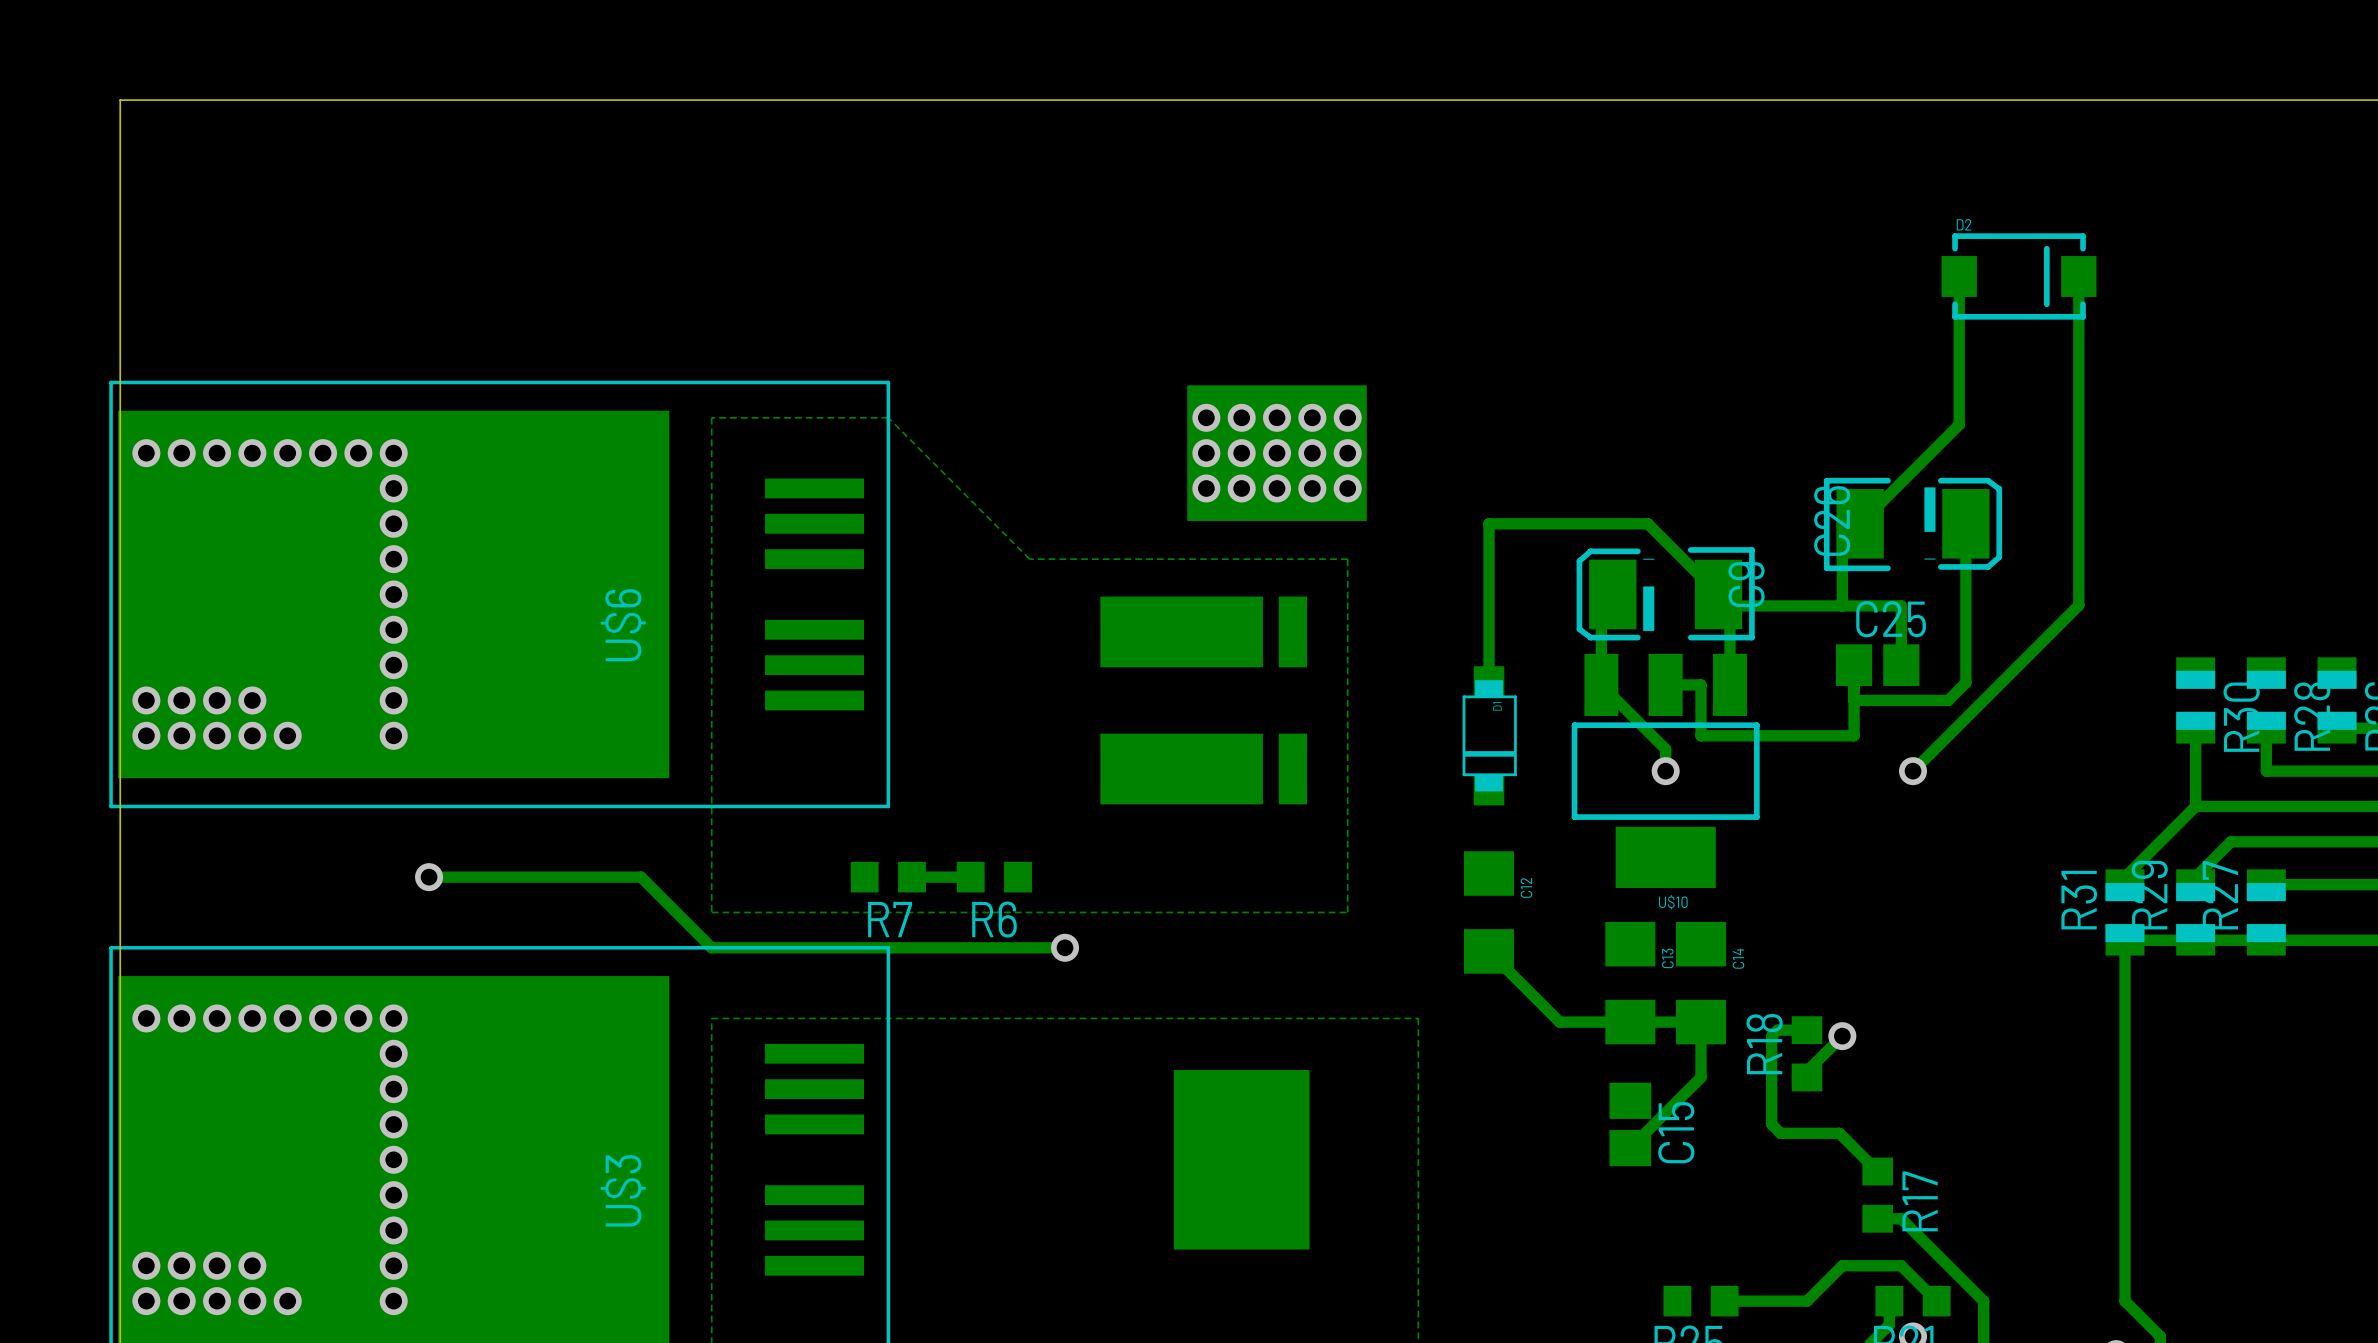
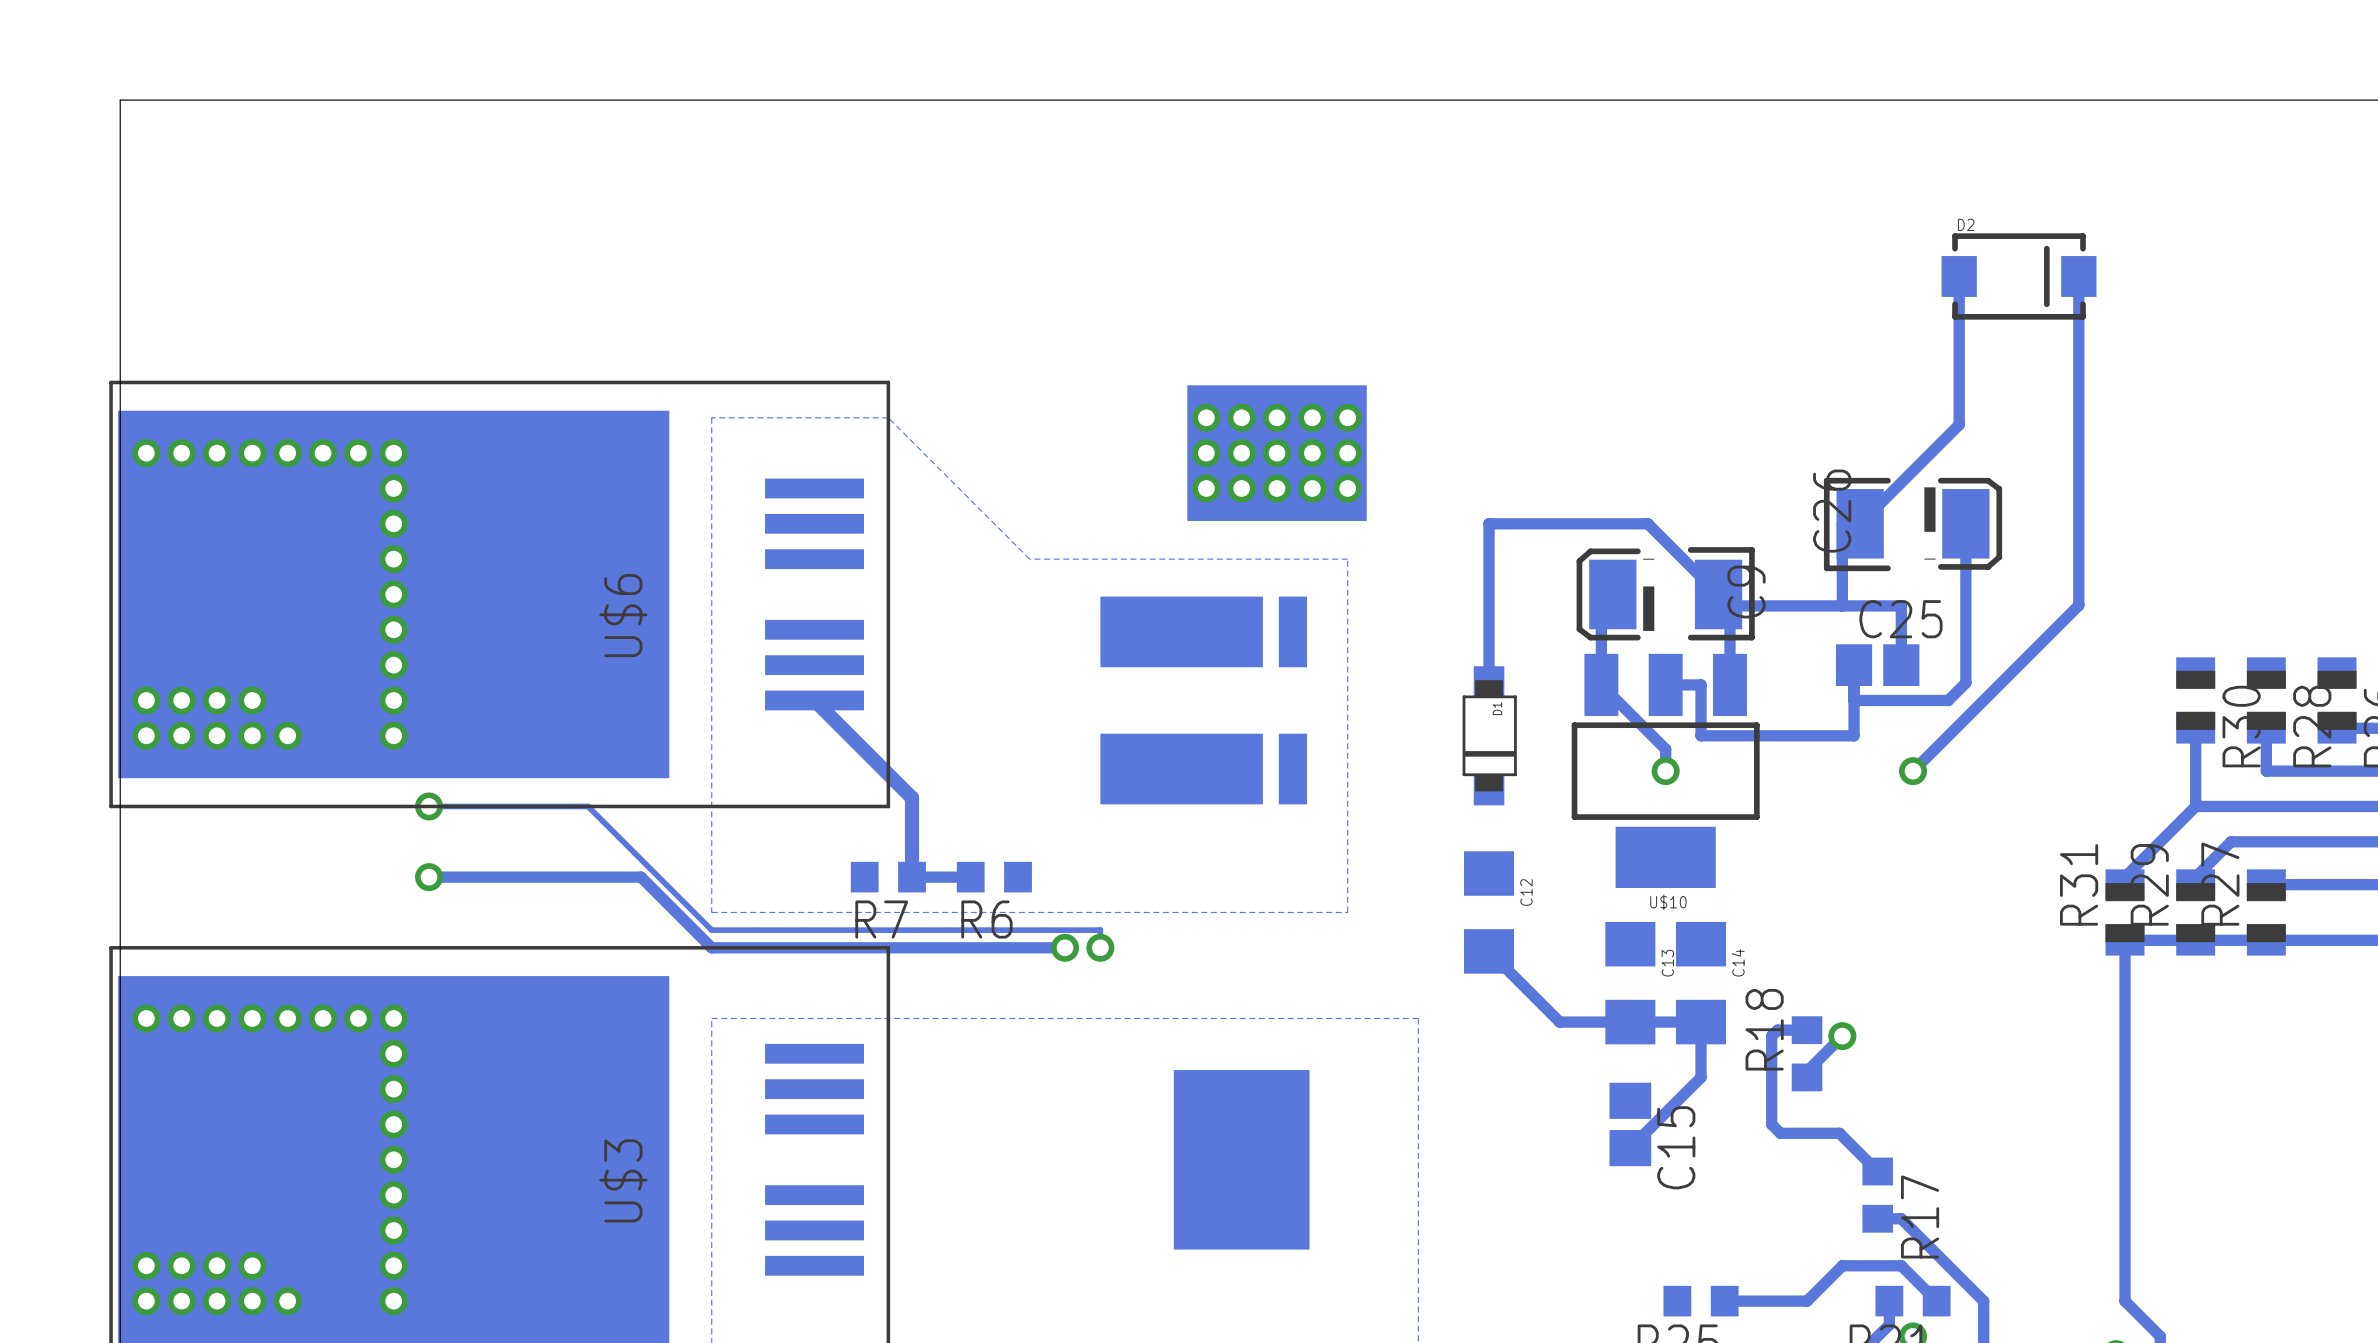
track: none -> (814, 700) (912, 797) (912, 877)
track: none -> (429, 806) (588, 806) (711, 930) (1100, 930) (1100, 947)
via: none -> (429, 806)
via: none -> (1100, 947)

